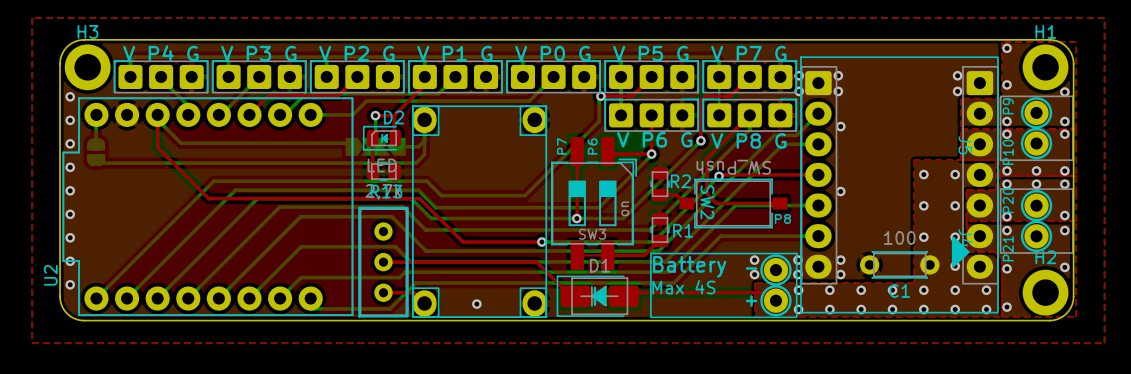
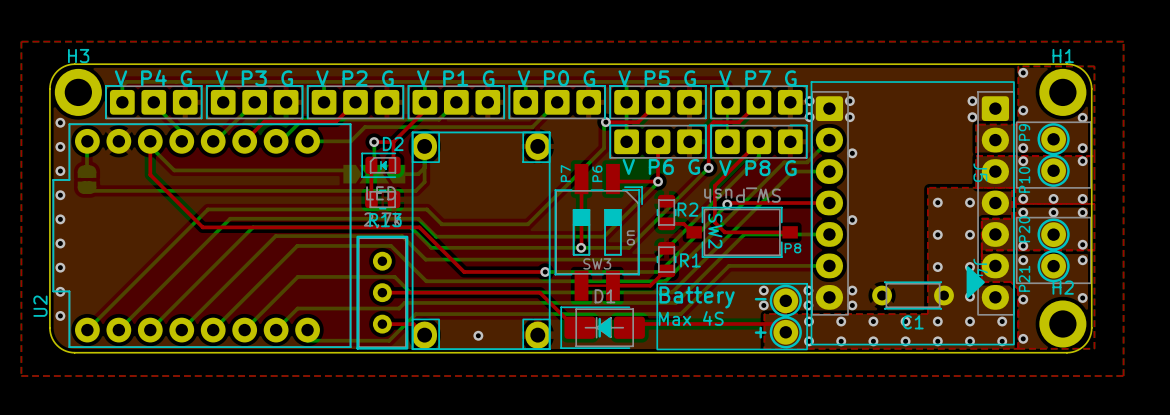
C1 value: 100 (899, 237) -> none

